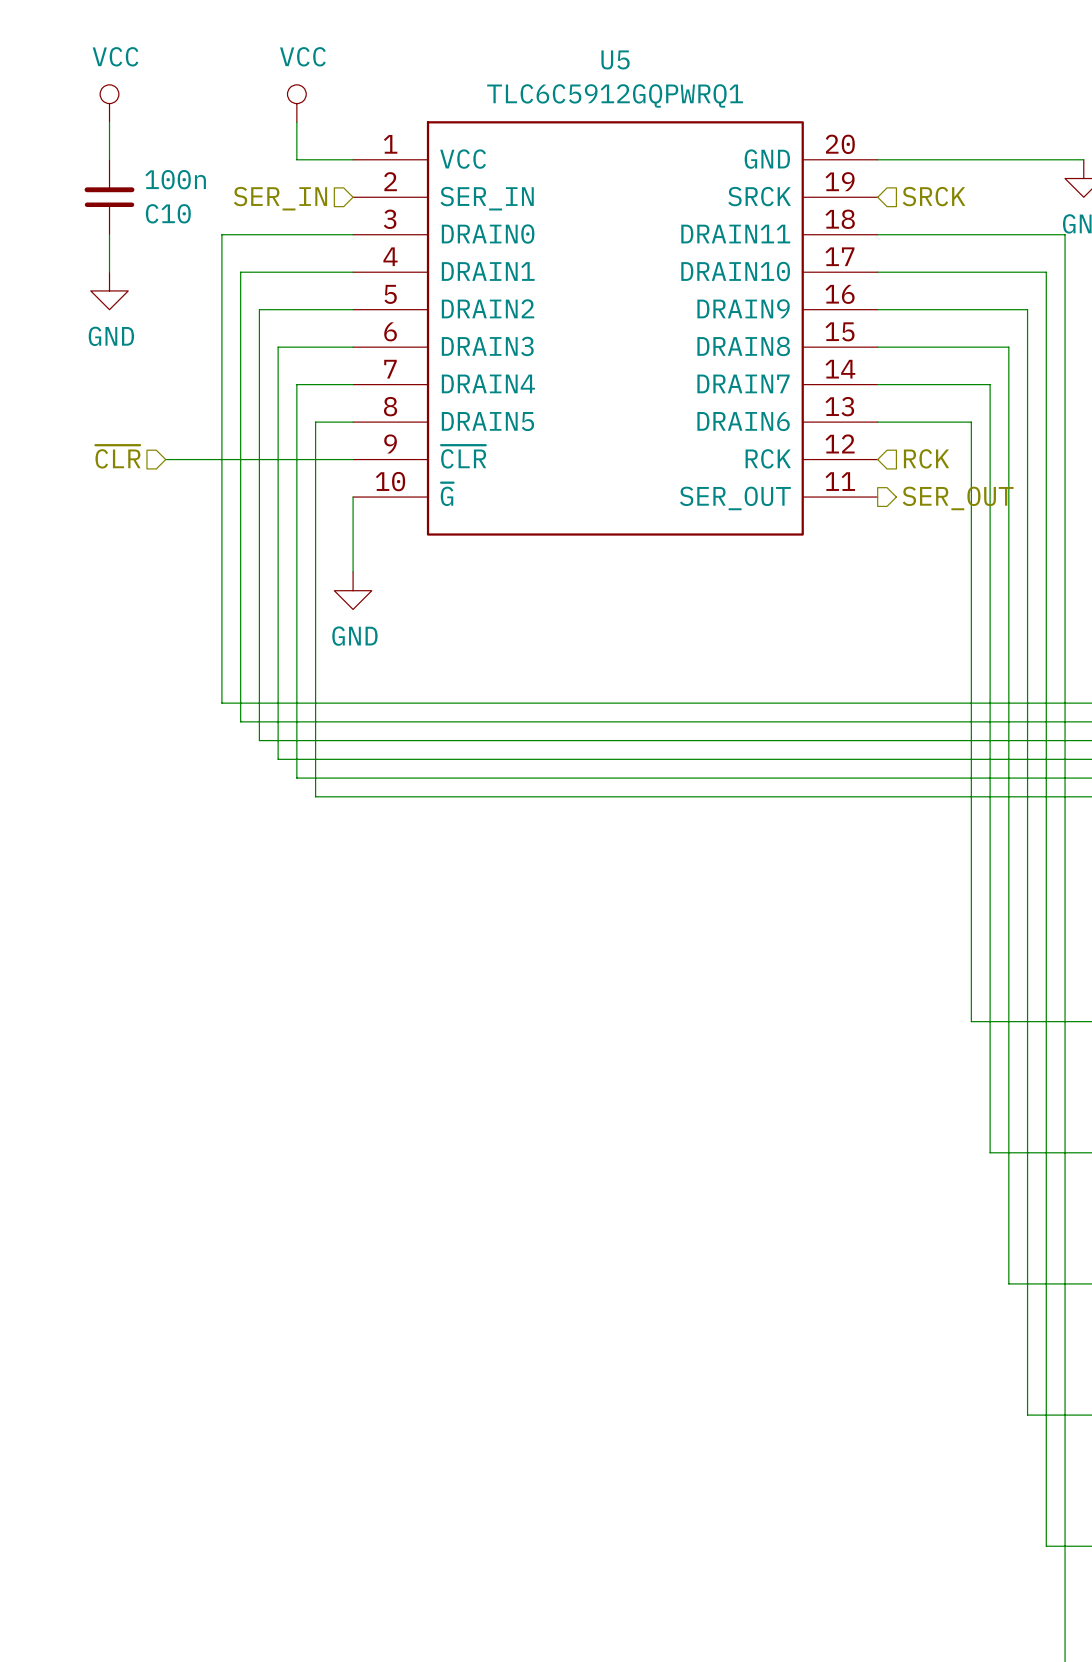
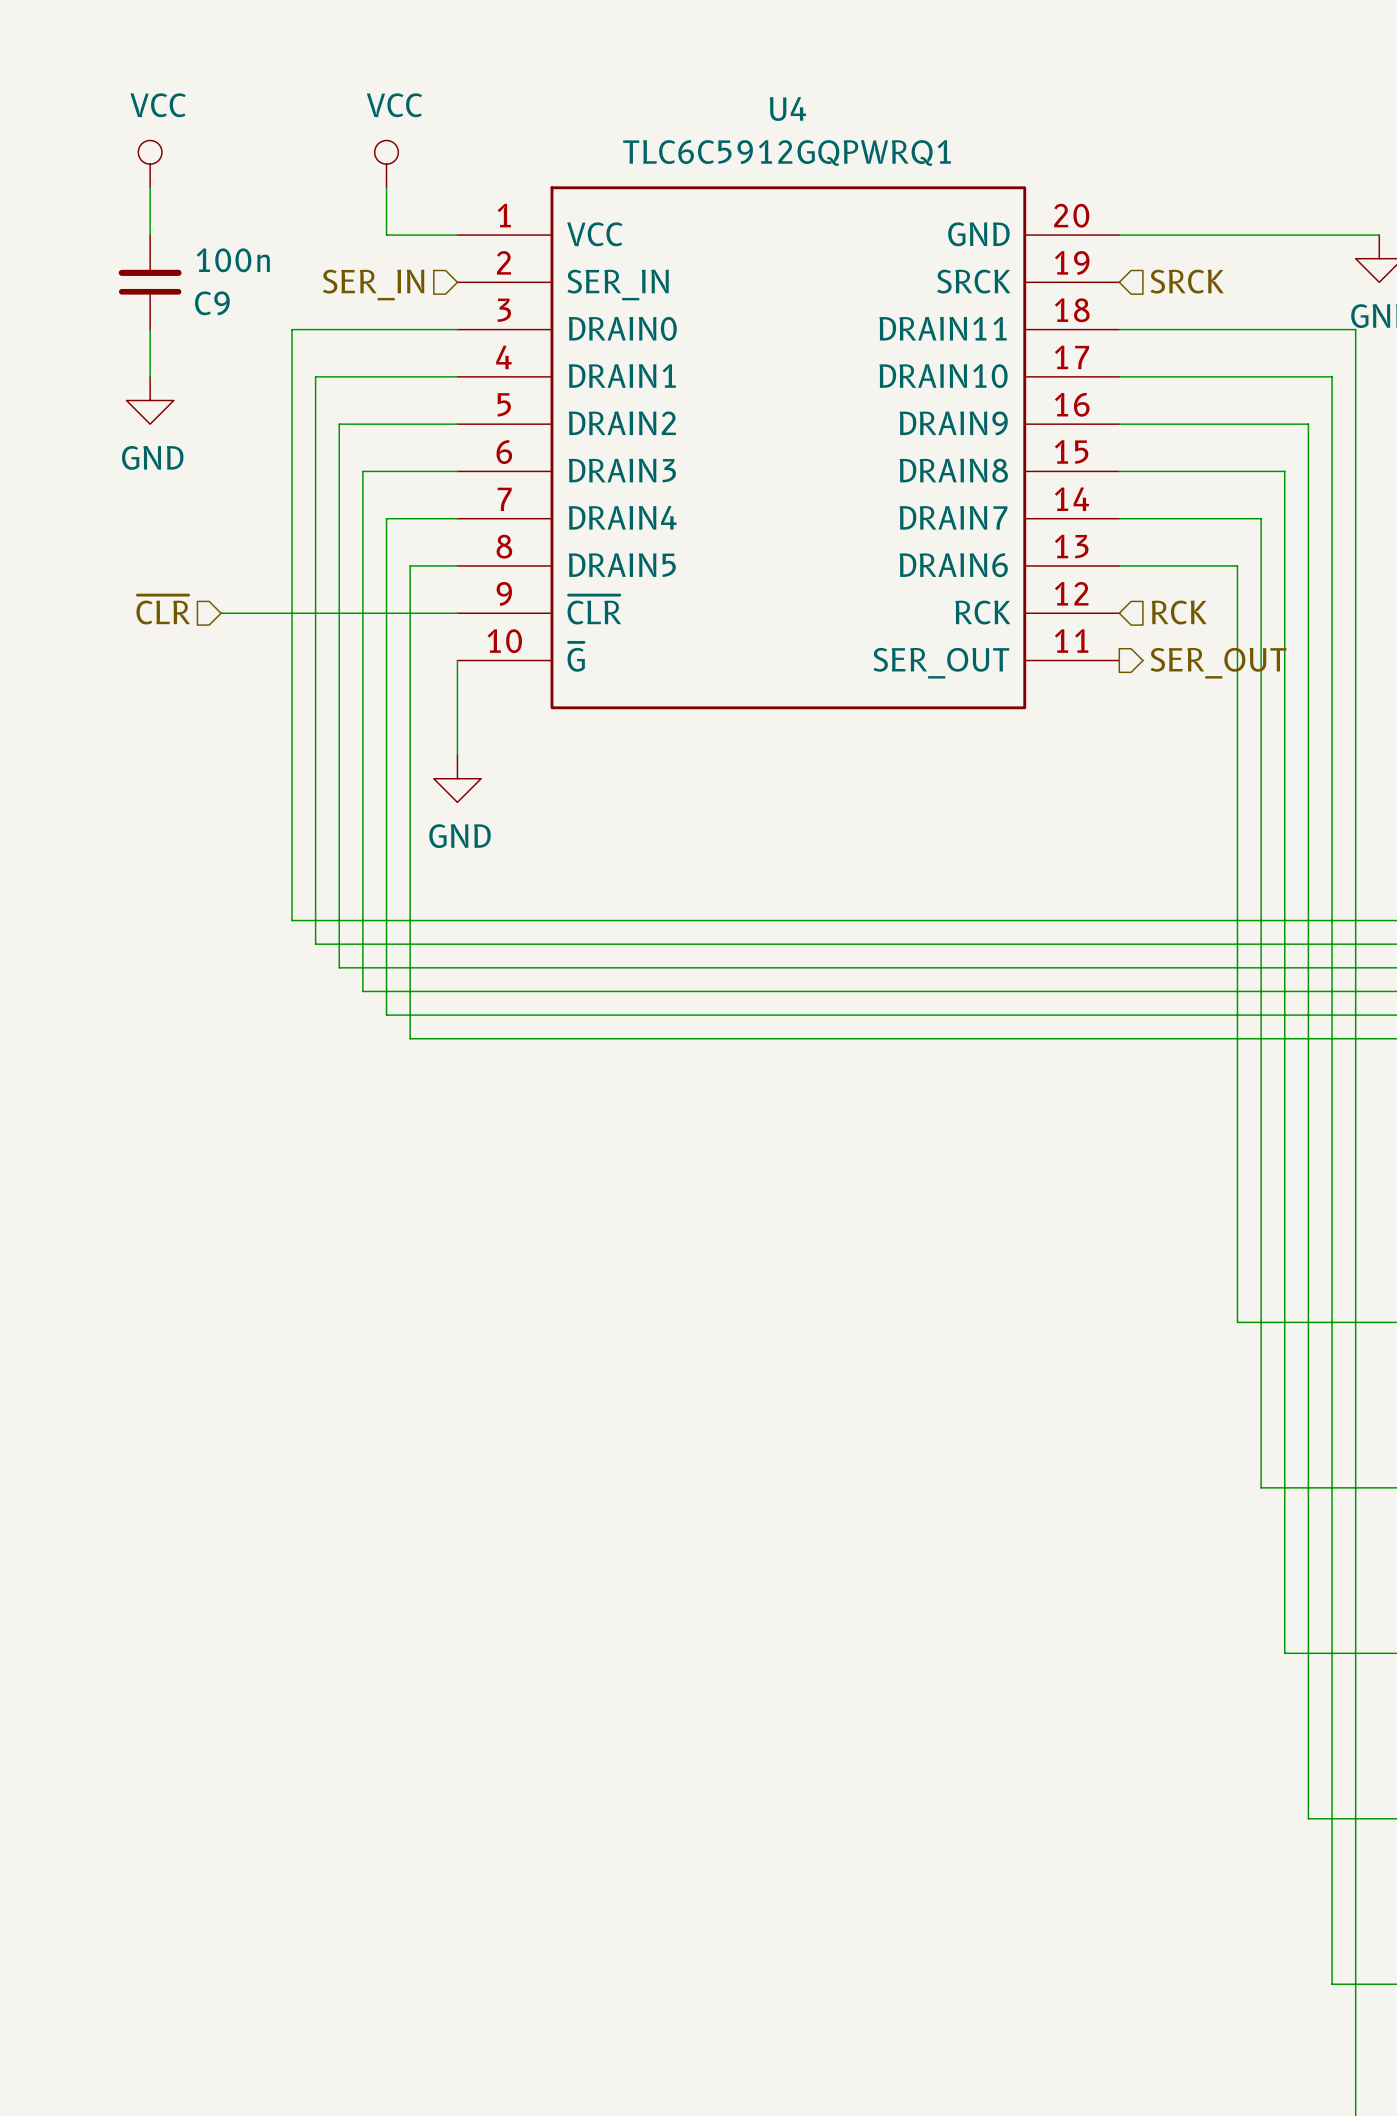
U5 name: U5 (615, 59) -> U4 (787, 109)
C10 name: C10 (168, 213) -> C9 (212, 303)

